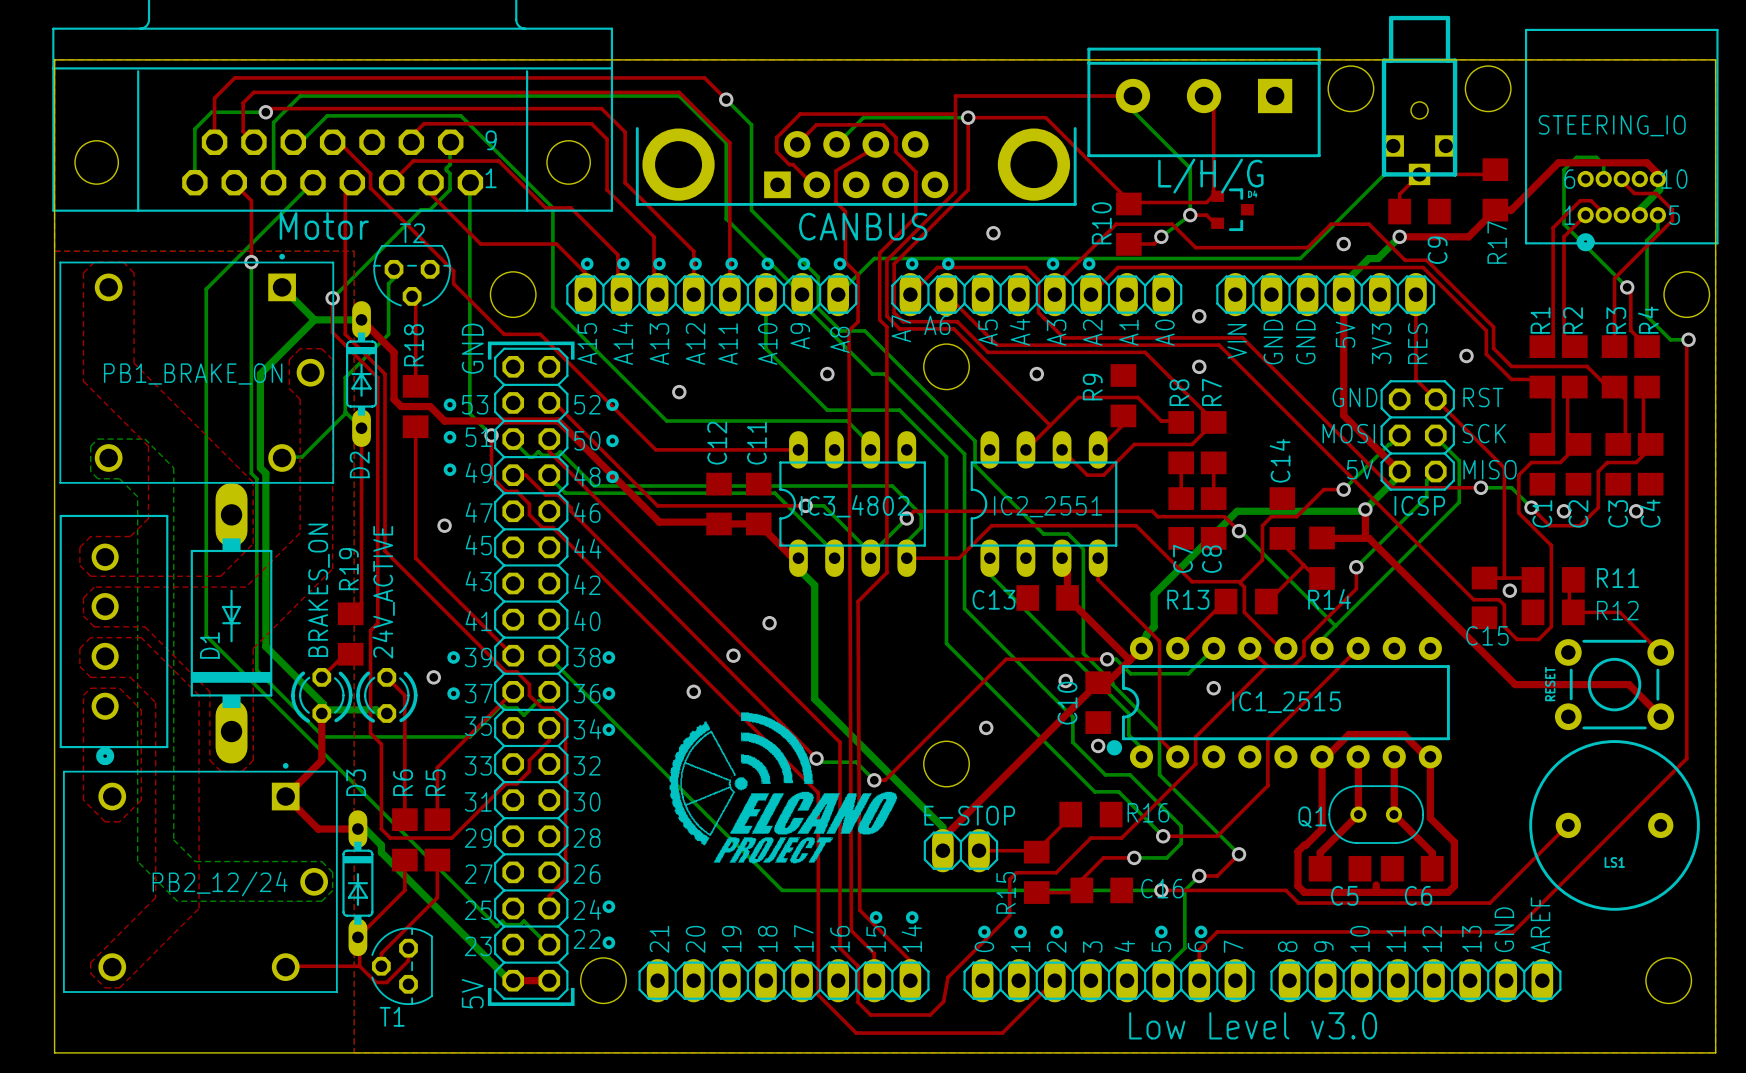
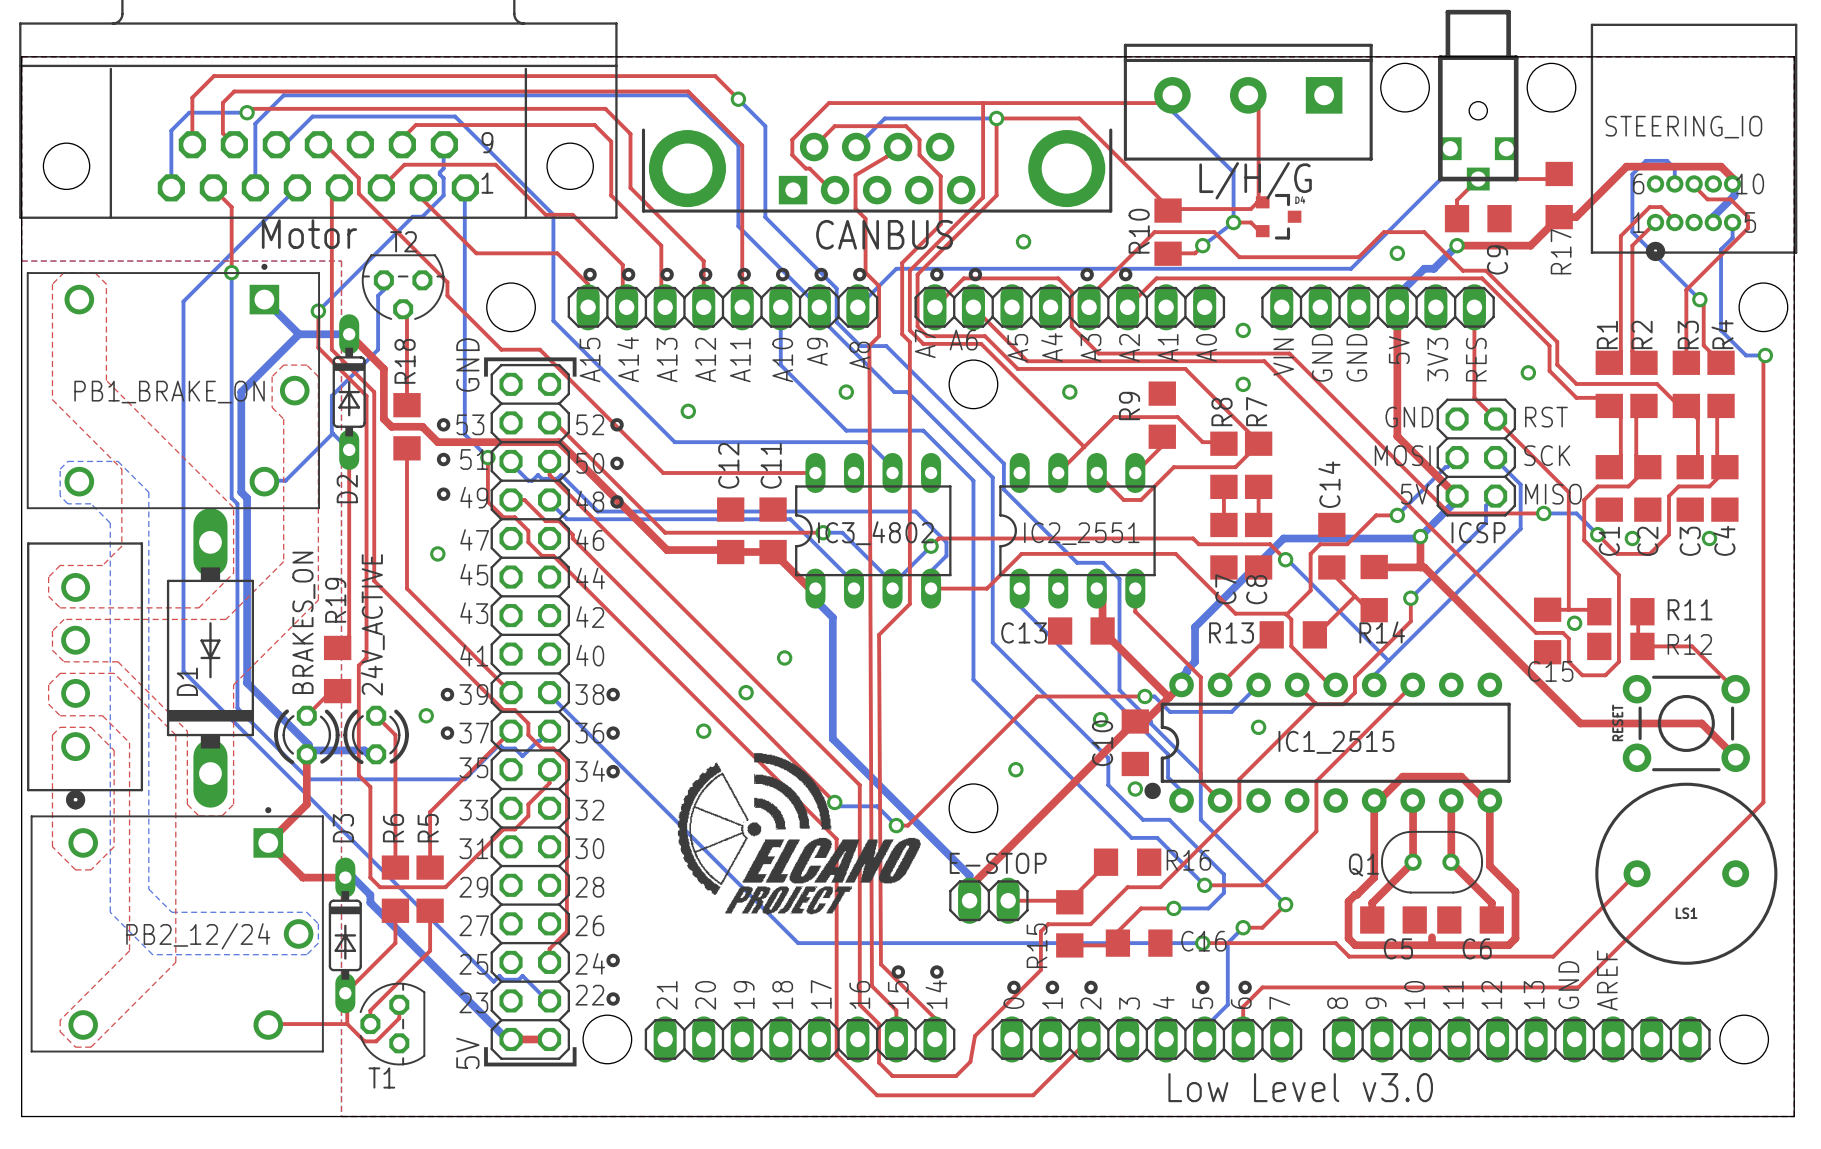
top track: (1132, 96) (955, 96) (955, 103) -> (1172, 95) (1164, 103) (828, 103) (817, 114)
top track: (800, 114) (955, 114) -> none
part: (1415, 980) -> none
part: none -> (1516, 1039)

